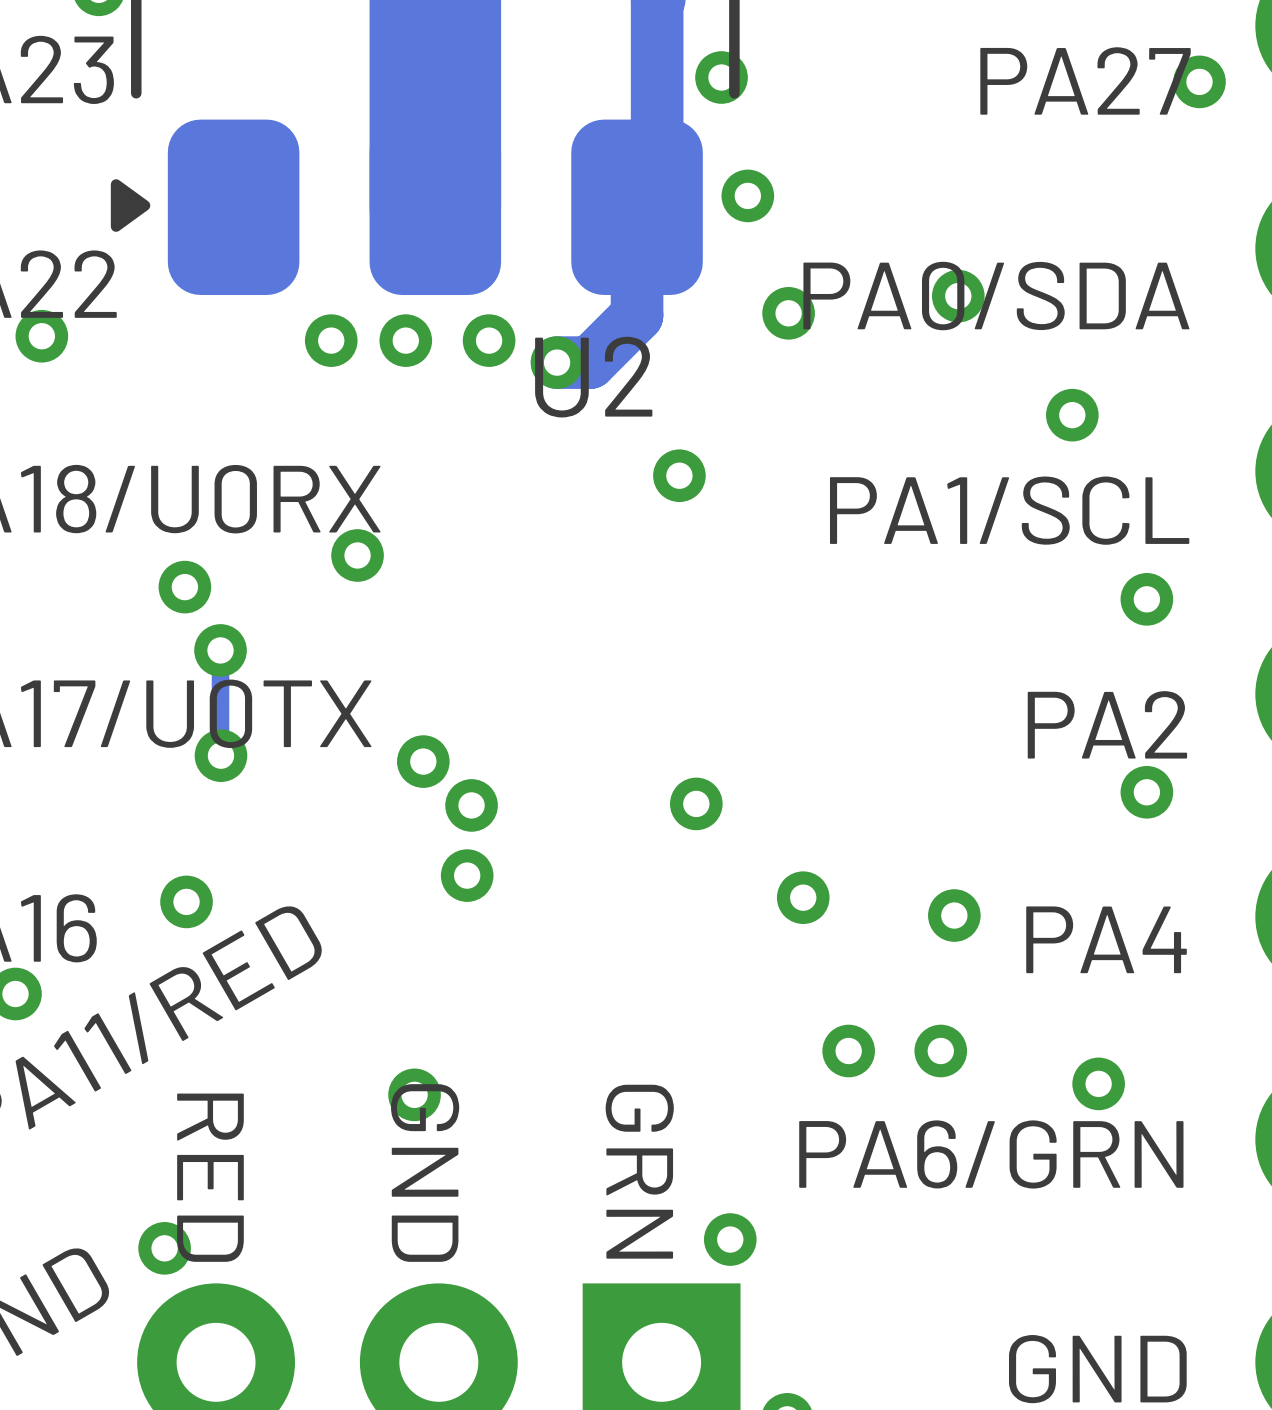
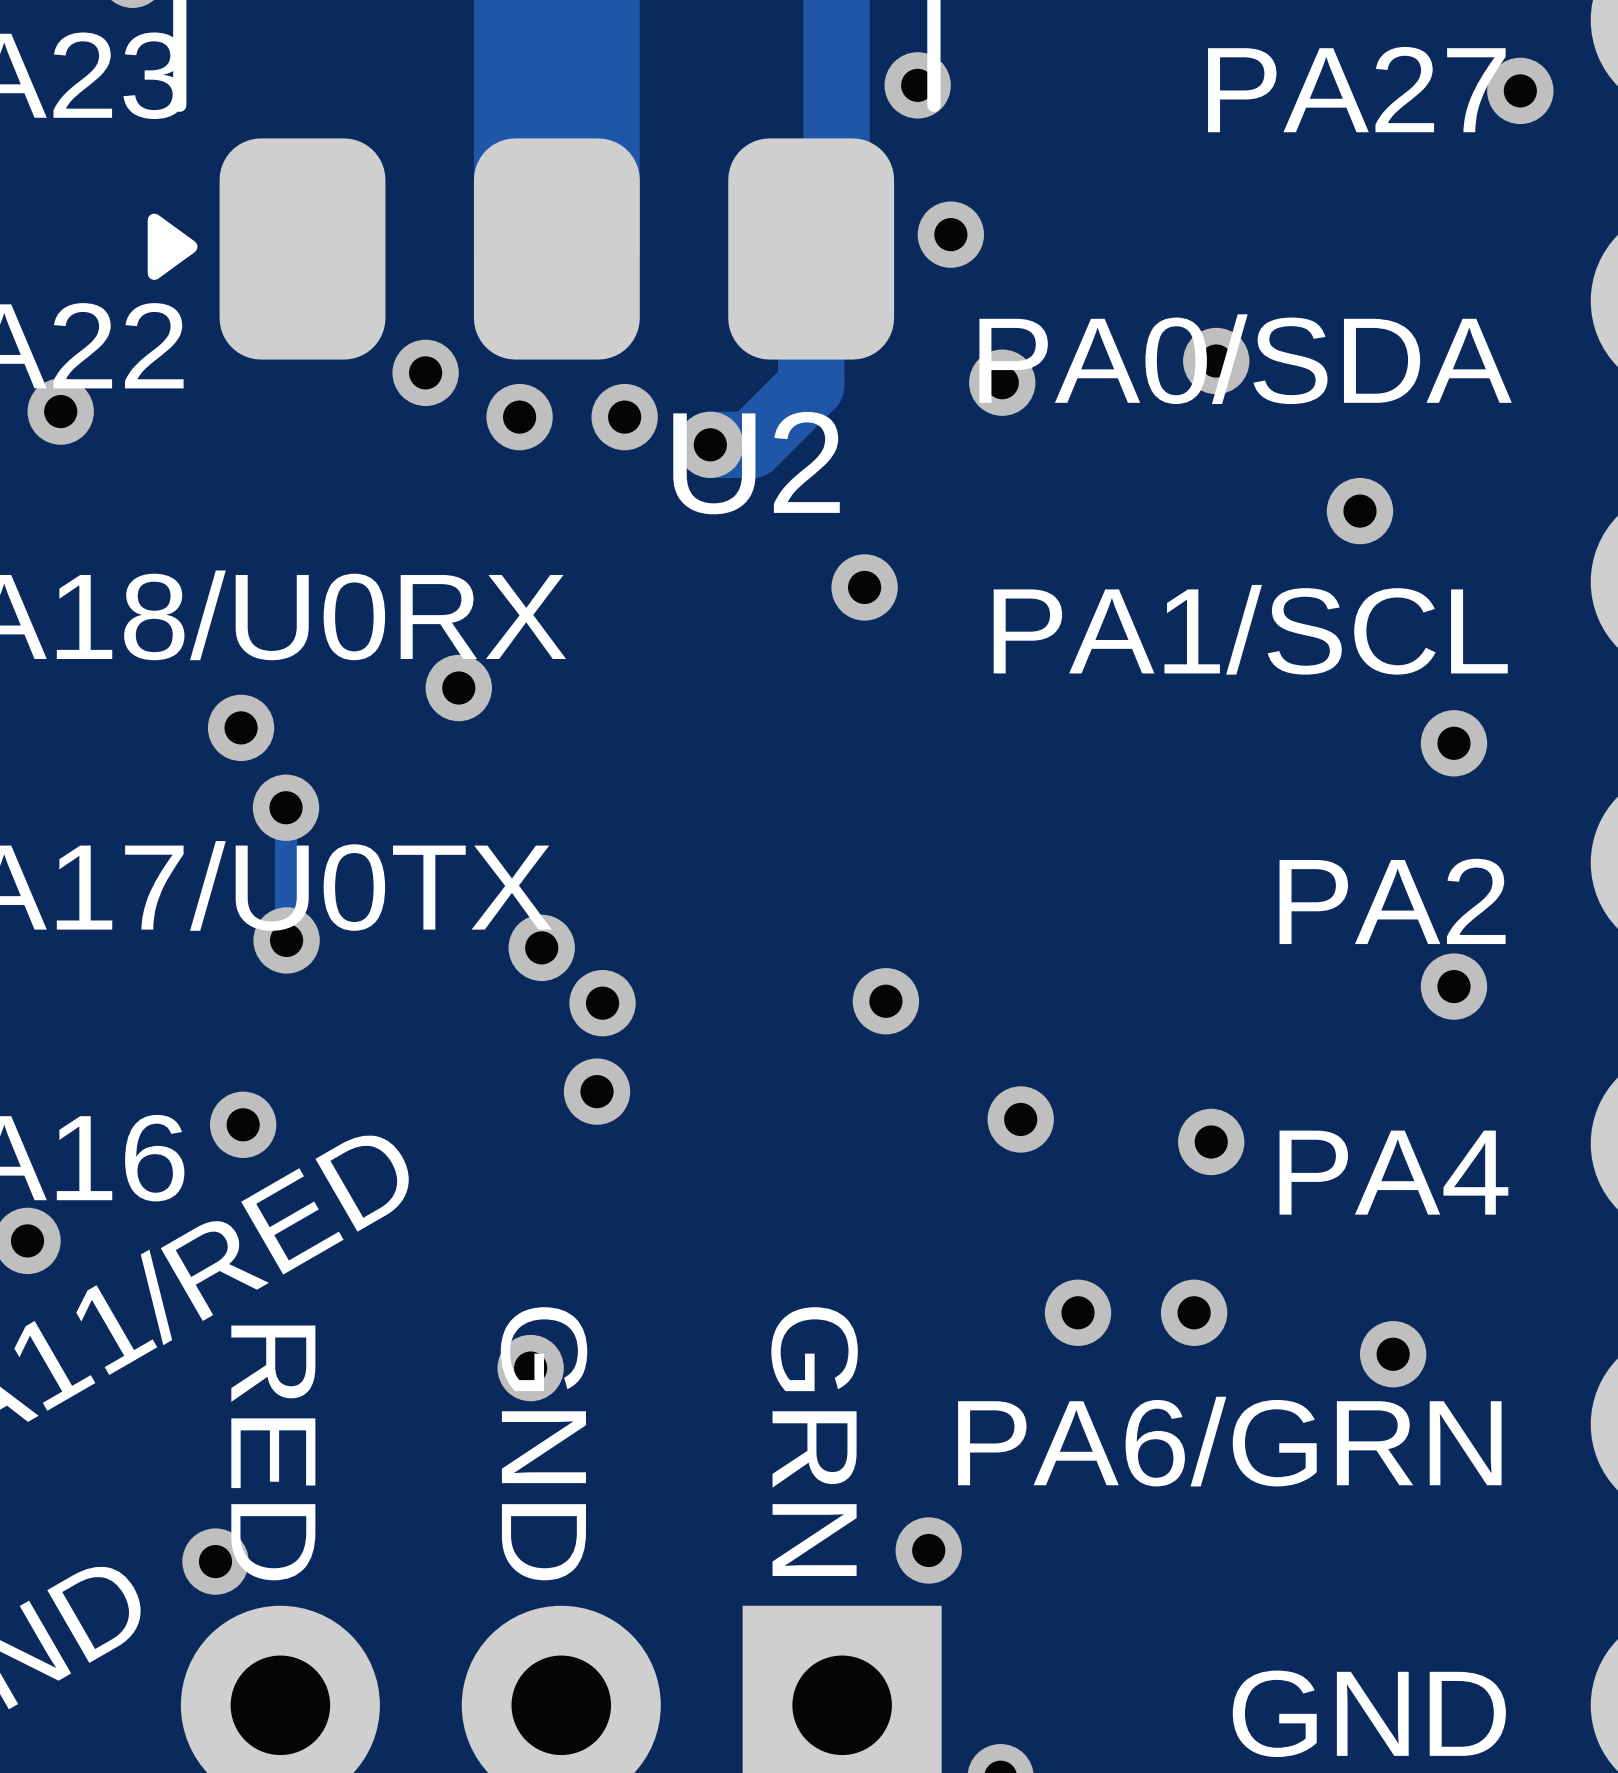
via position: (331, 340) -> (425, 372)

